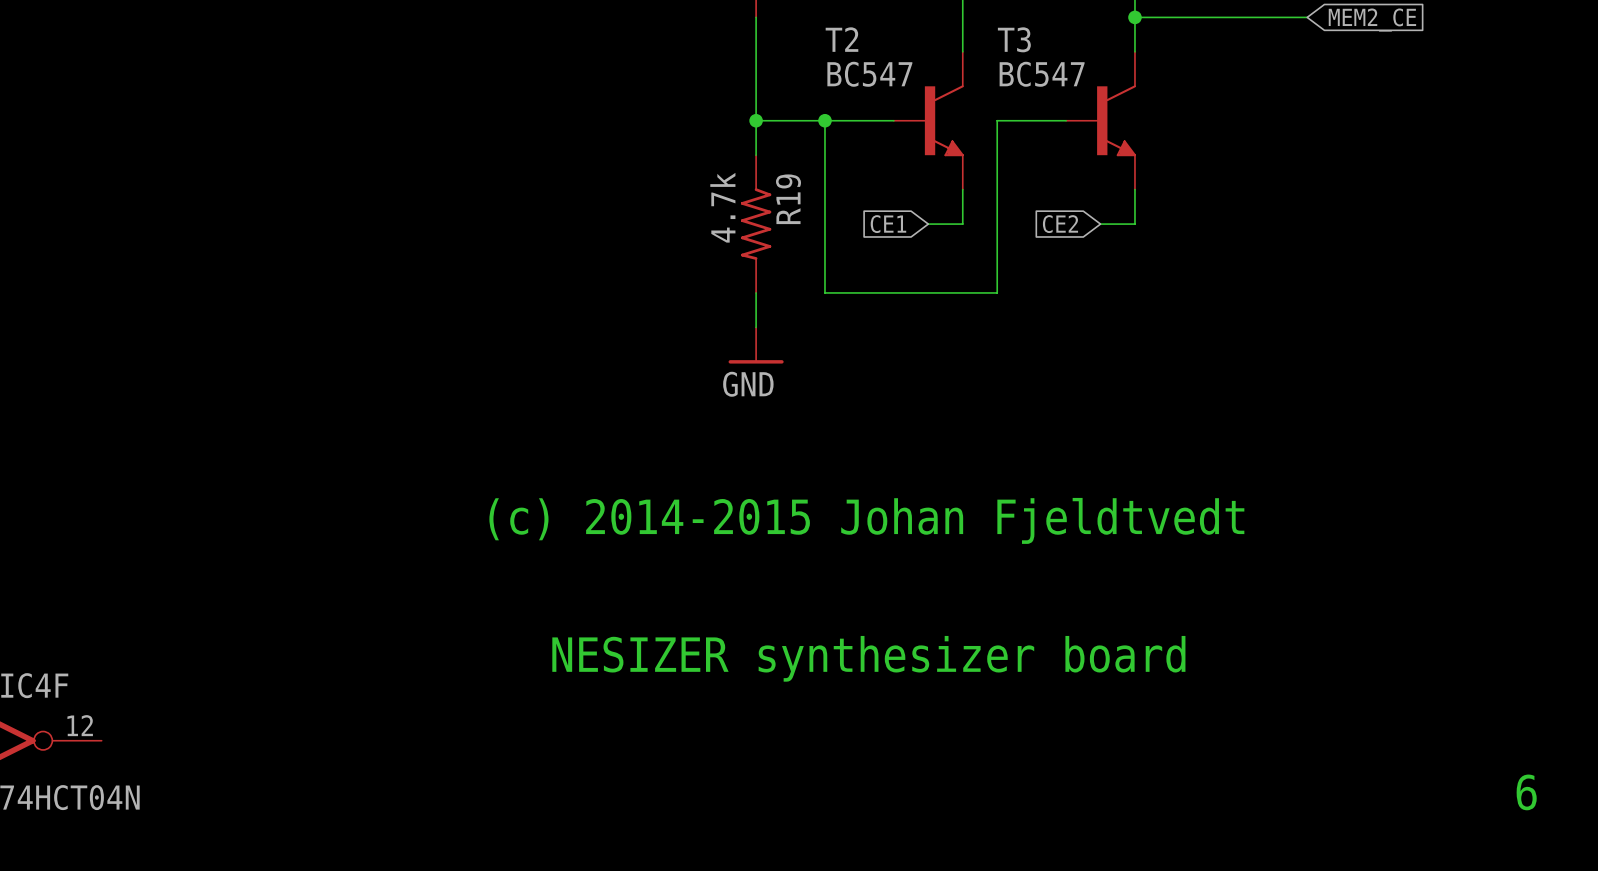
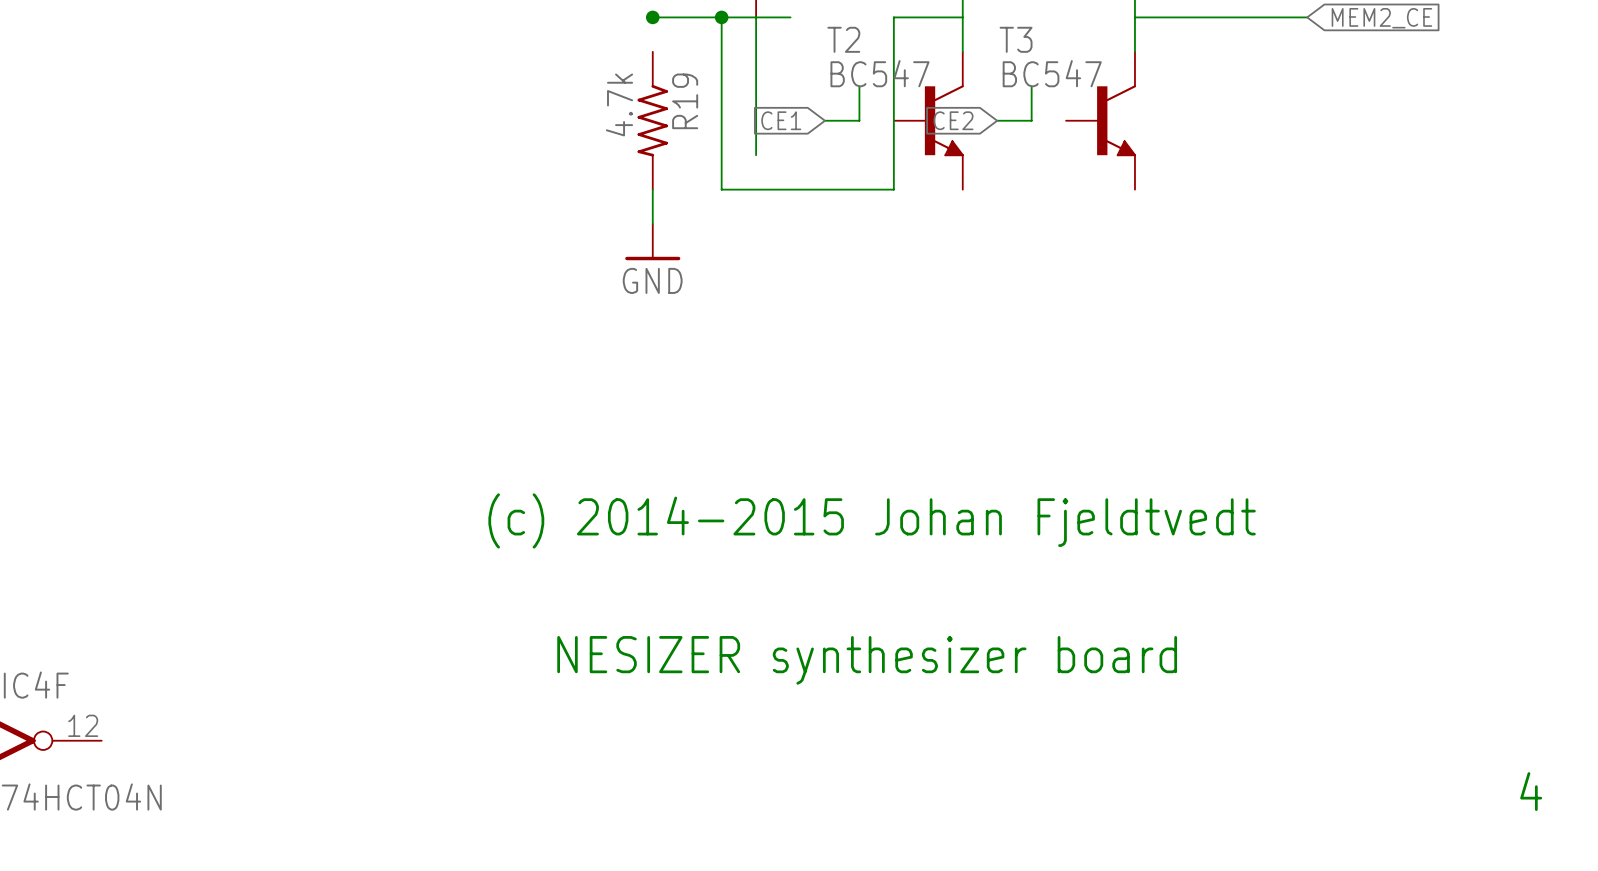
wire: none -> (652, 17) (790, 17)
junction: none -> (652, 17)
wire: none -> (721, 17) (721, 189) (893, 189) (893, 17) (962, 17)
junction: none -> (721, 17)
junction: (1134, 17) -> none
wire: (756, 120) (824, 120) (824, 292) (997, 292) (997, 120) -> none
junction: (756, 120) -> none
junction: (824, 120) -> none
wire: (859, 120) (893, 120) -> (859, 120) (859, 86)
wire: (1031, 120) (1066, 120) -> (1031, 120) (1031, 86)
wire: (962, 189) (962, 224) (928, 224) -> none
wire: (1134, 189) (1134, 224) (1100, 224) -> none
R19 position: (756, 224) -> (652, 120)
global label position: CE1 (888, 224) -> CE1 (781, 120)
global label position: CE2 (1060, 224) -> CE2 (953, 120)
wire: (756, 292) (756, 327) -> (652, 189) (652, 224)
power symbol position: GND (756, 345) -> GND (652, 242)
text: 6 (1526, 792) -> 4 (1531, 791)

